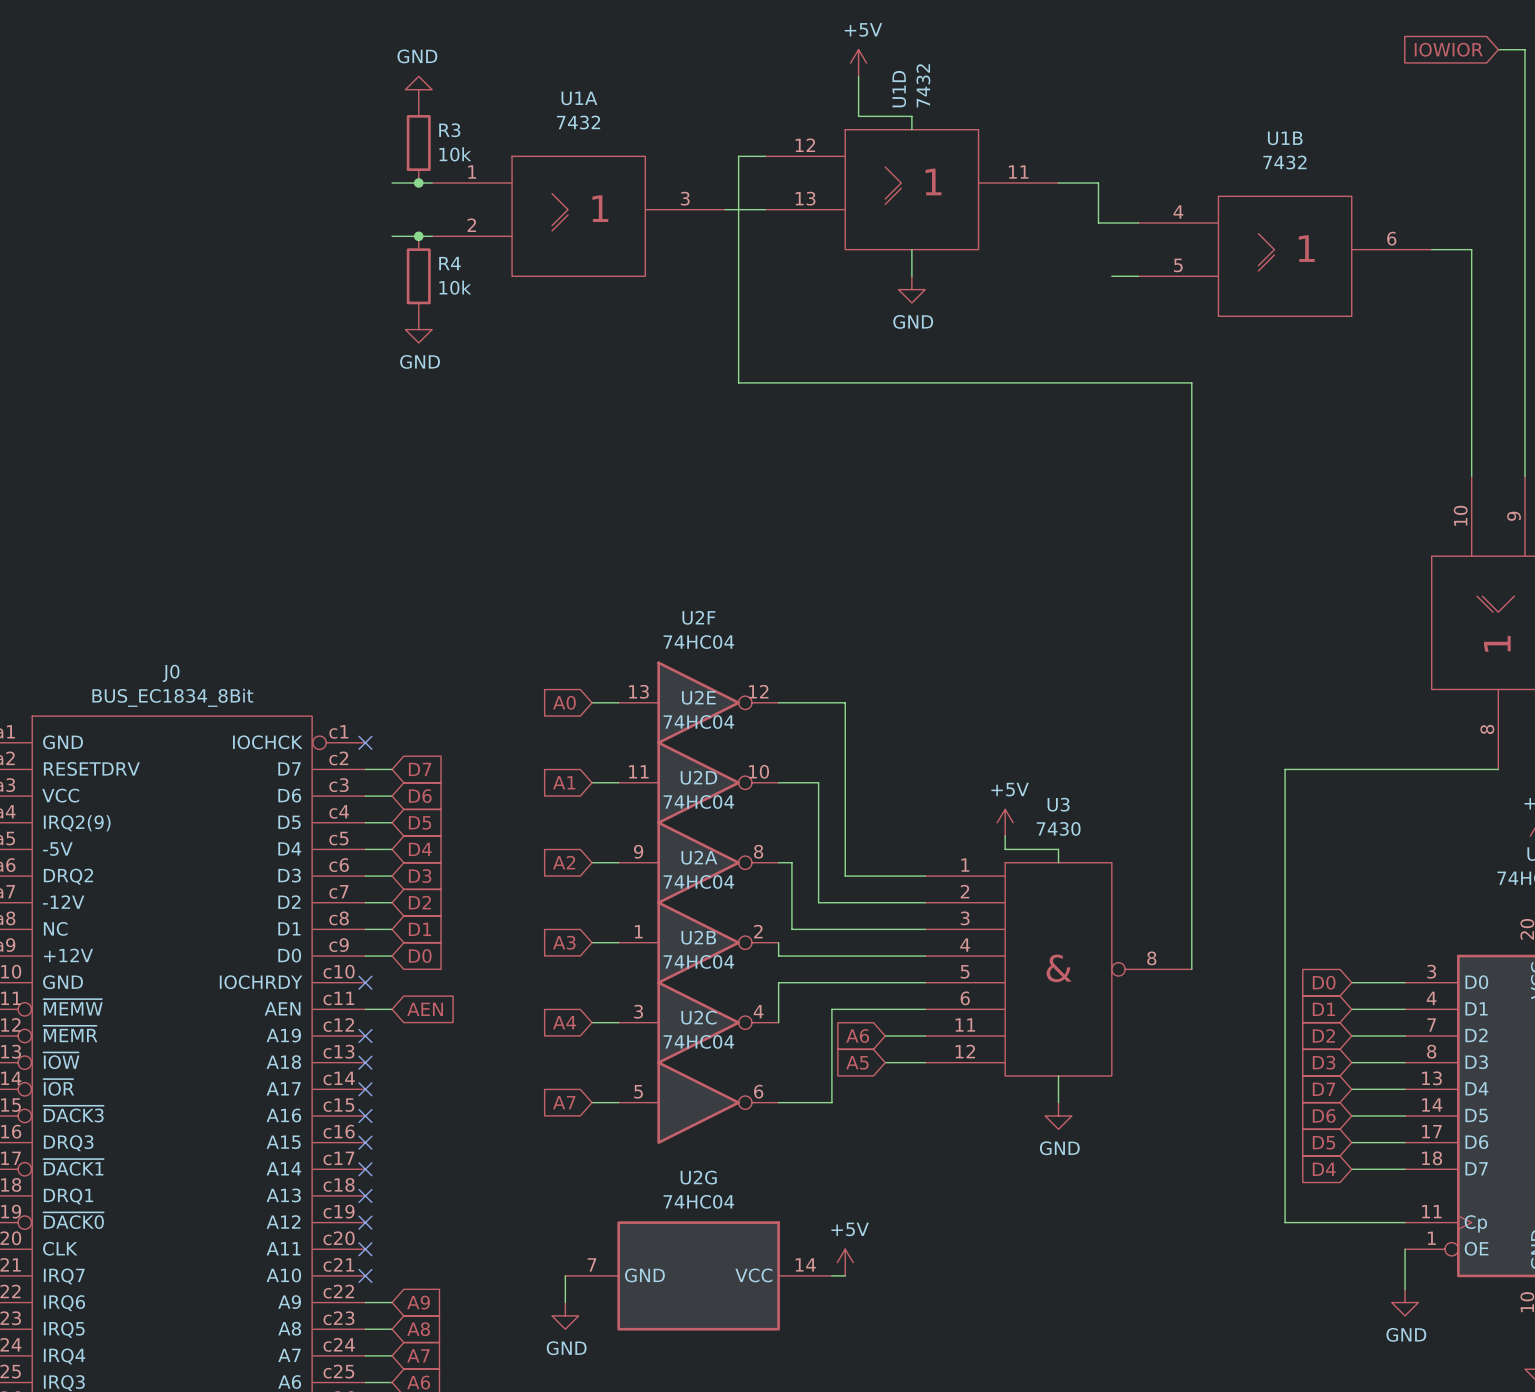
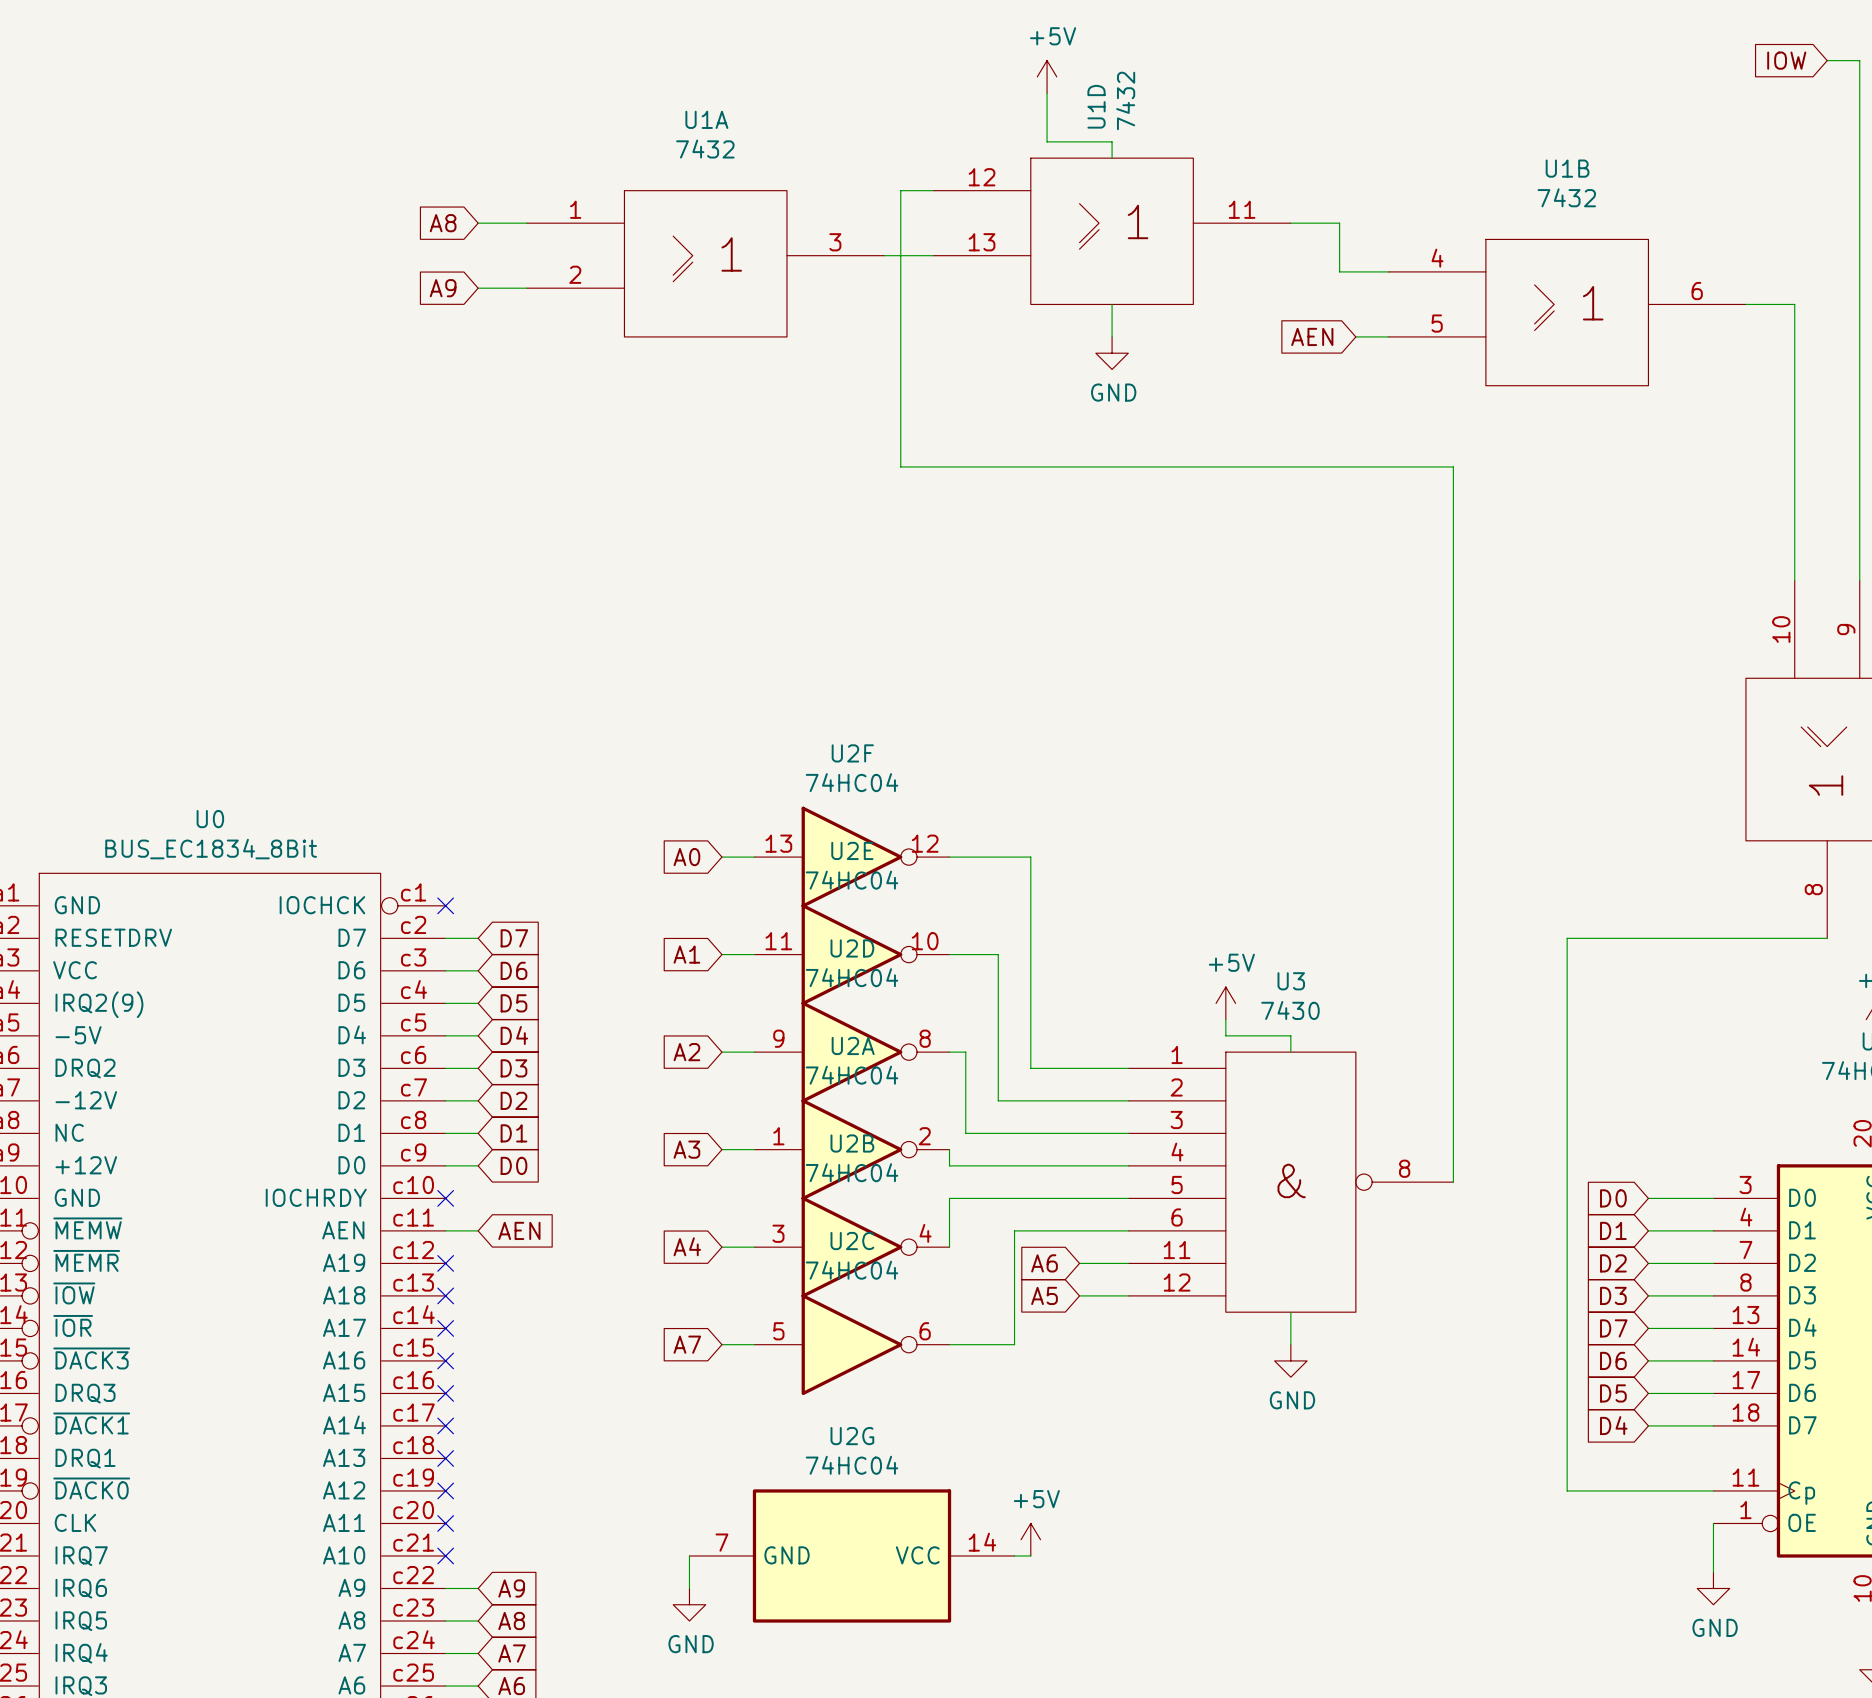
global label: IOWIOR (1448, 49) -> IOW (1786, 60)
power symbol: GND (418, 89) -> none
R3: 10k (418, 143) -> none
global label: none -> A8 (443, 223)
junction: (418, 183) -> none
global label: none -> A9 (443, 288)
junction: (418, 236) -> none
R4: 10k (418, 276) -> none
global label: none -> AEN (1312, 336)
power symbol: GND (418, 329) -> none
J0 name: J0 (171, 673) -> U0 (210, 819)

